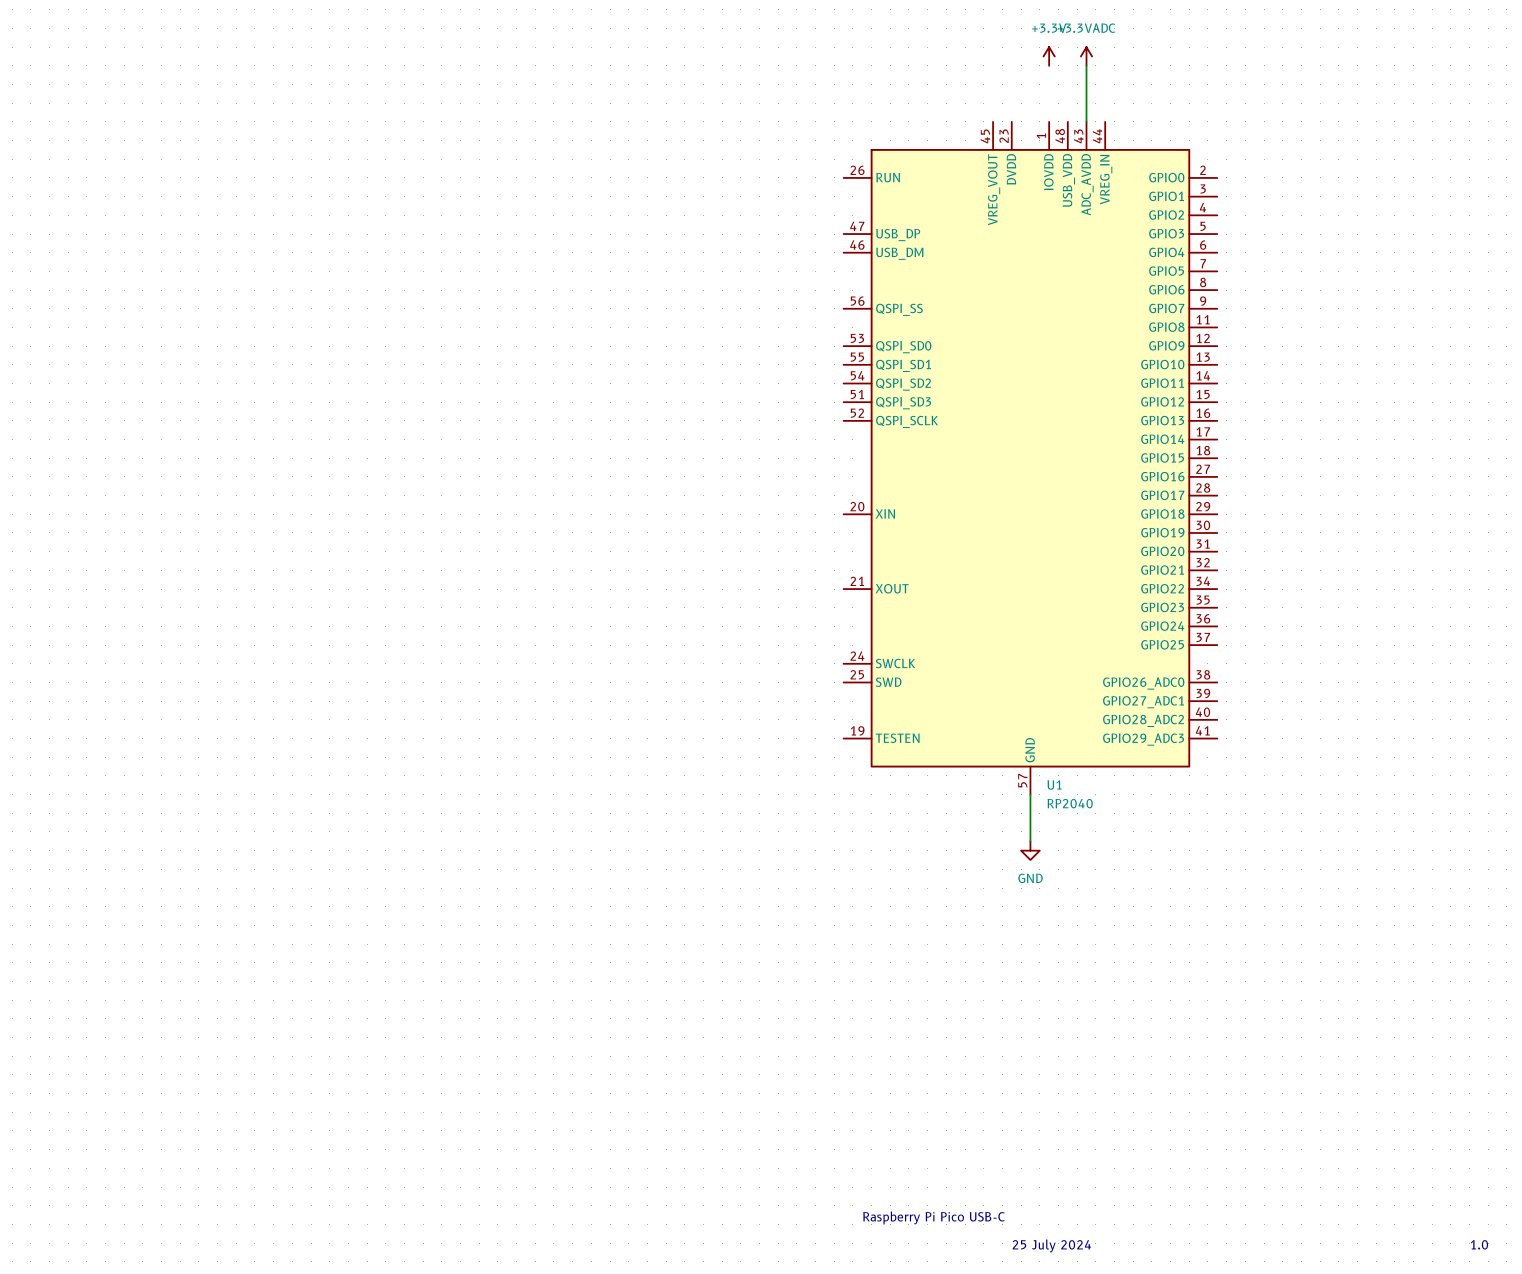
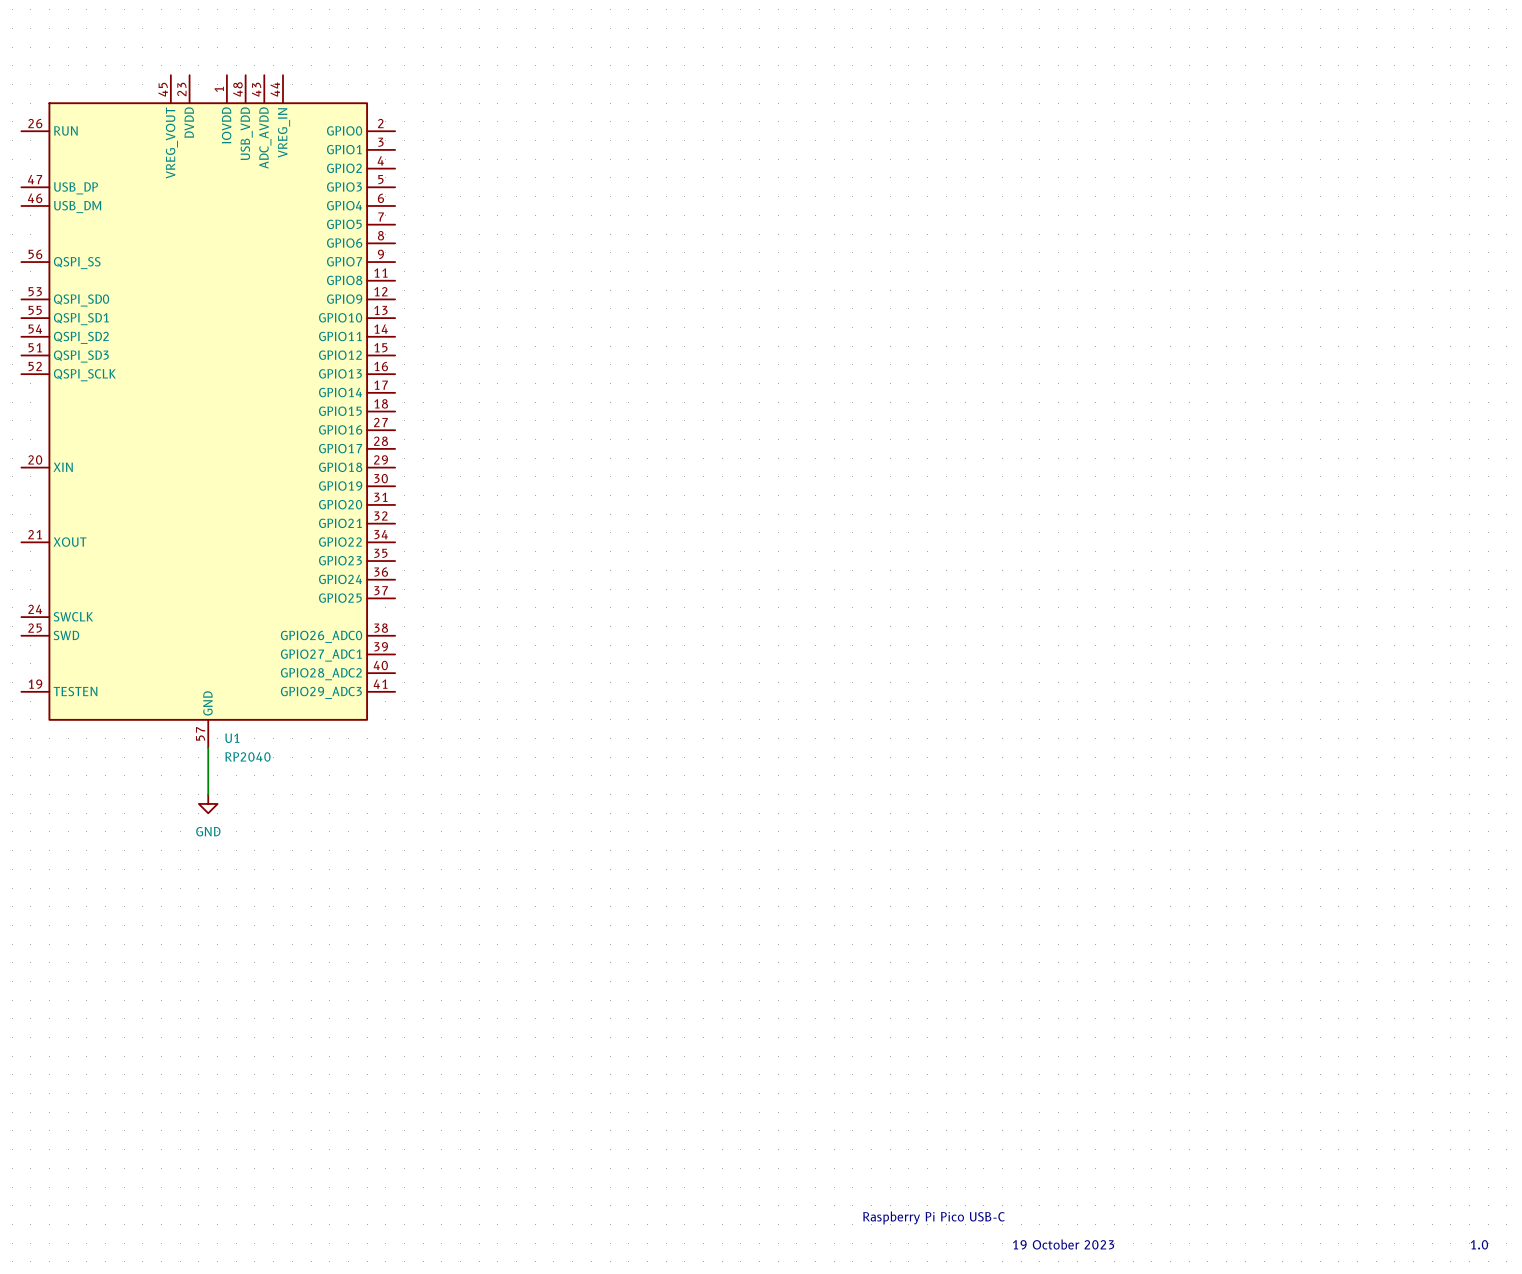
power symbol: +3.3V (1049, 56) -> none
power symbol: +3.3VADC (1086, 56) -> none
wire: (1086, 65) (1086, 121) -> none
U1 position: (1030, 458) -> (208, 411)
wire: none -> (208, 747) (208, 794)
wire: (1030, 794) (1030, 841) -> none
power symbol: none -> GND (208, 803)
power symbol: GND (1030, 850) -> none
text: 25 July 2024 (1051, 1245) -> 19 October 2023 (1063, 1244)

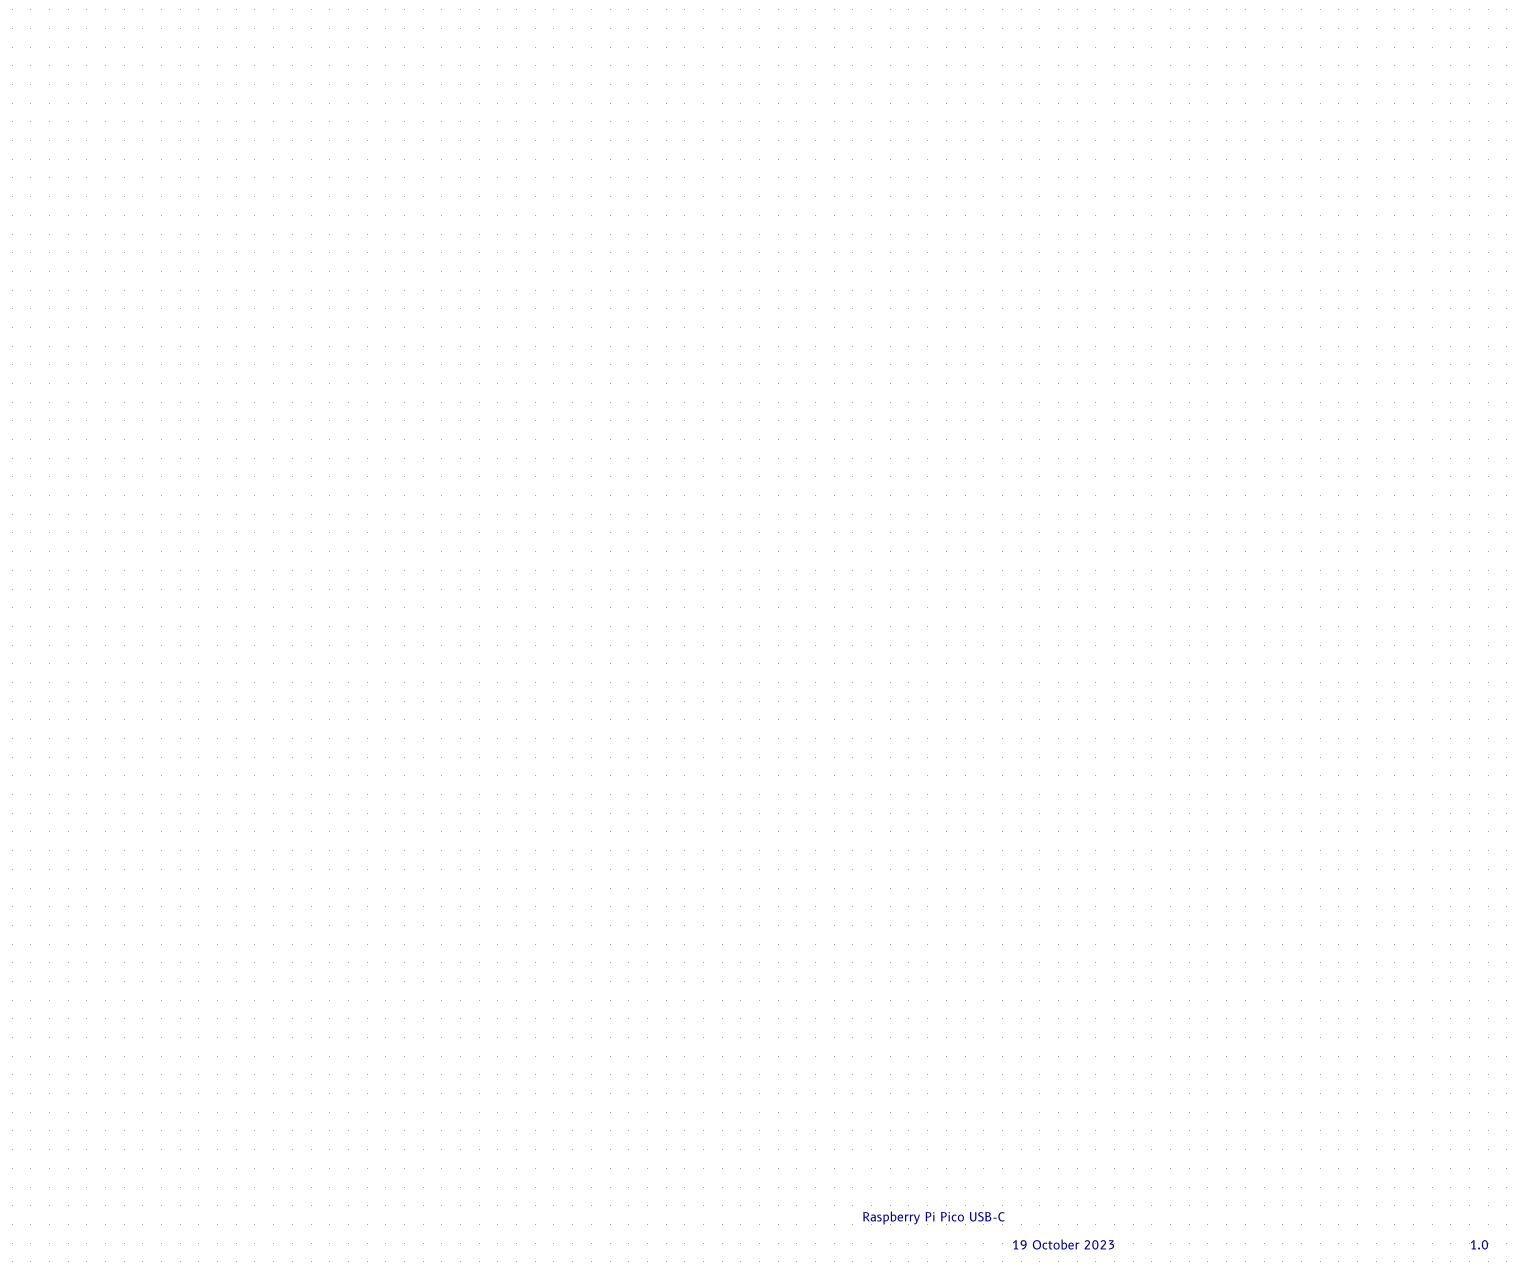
U1: RP2040 (208, 411) -> none
wire: (208, 747) (208, 794) -> none
power symbol: GND (208, 803) -> none

